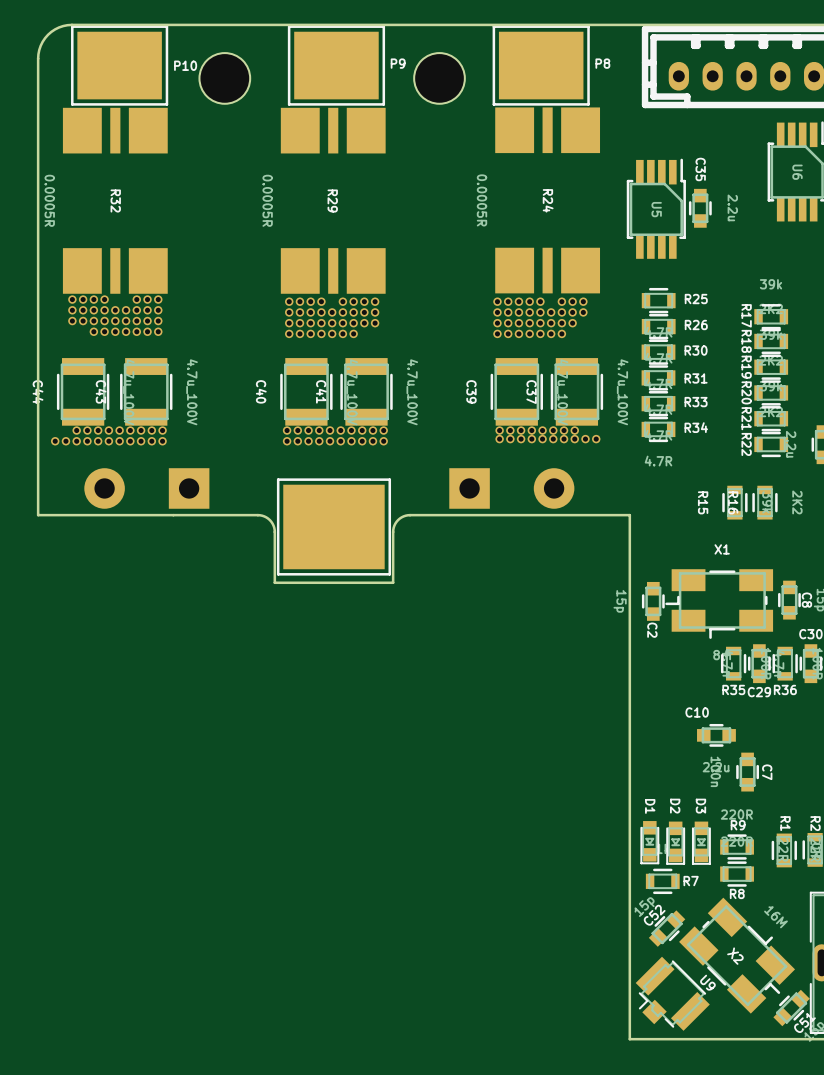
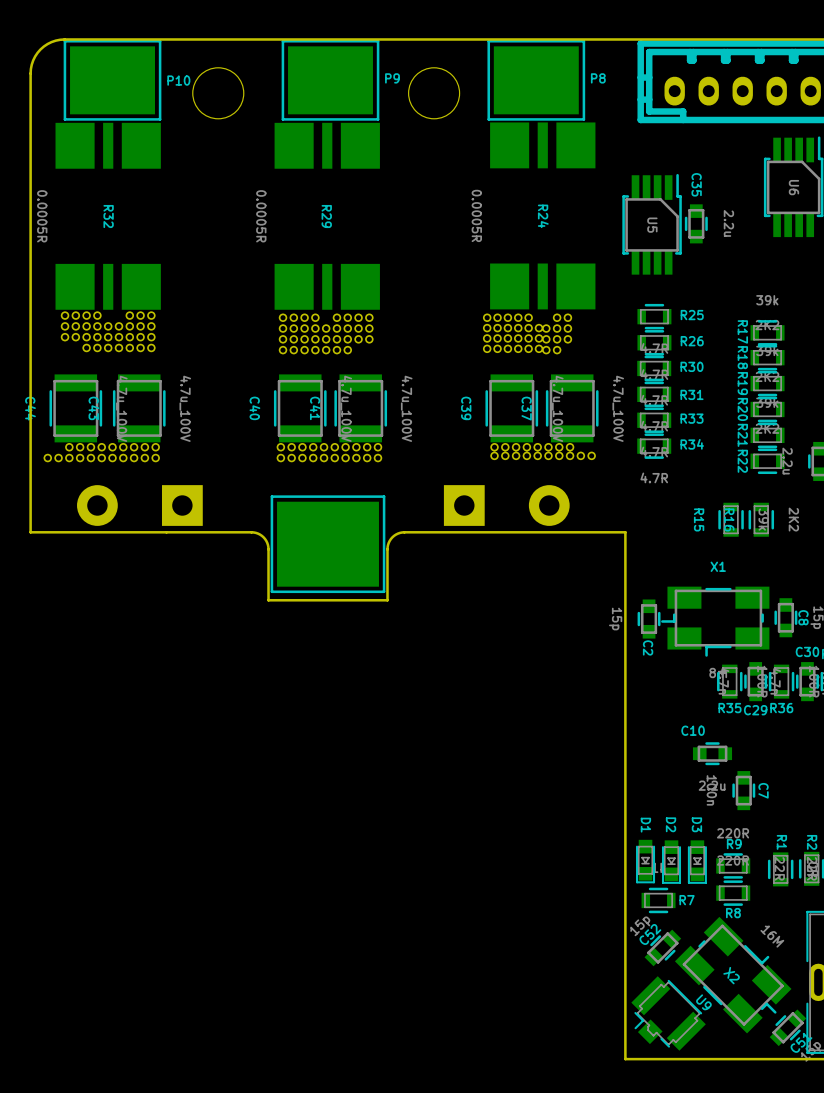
part: none -> (487, 317)
part: (497, 301) -> none
part: none -> (497, 317)
part: (508, 301) -> none
part: none -> (507, 317)
part: (518, 301) -> none
part: none -> (518, 317)
part: (529, 301) -> none
part: none -> (528, 317)
part: (540, 301) -> none
part: (583, 301) -> none
part: none -> (487, 328)
part: (497, 312) -> none
part: none -> (497, 328)
part: (508, 312) -> none
part: none -> (507, 328)
part: (518, 312) -> none
part: none -> (518, 328)
part: (529, 312) -> none
part: none -> (528, 328)
part: (540, 312) -> none
part: none -> (538, 328)
part: (583, 312) -> none
part: none -> (487, 338)
part: none -> (497, 338)
part: none -> (507, 338)
part: none -> (518, 338)
part: none -> (528, 338)
part: none -> (538, 338)
part: (497, 323) -> none
part: (508, 323) -> none
part: (518, 323) -> none
part: (529, 323) -> none
part: (540, 323) -> none
part: none -> (487, 348)
part: none -> (497, 348)
part: none -> (507, 348)
part: none -> (518, 348)
part: none -> (528, 348)
part: none -> (538, 348)
part: (497, 333) -> none
part: (508, 333) -> none
part: (518, 333) -> none
part: (529, 333) -> none
part: (540, 333) -> none

